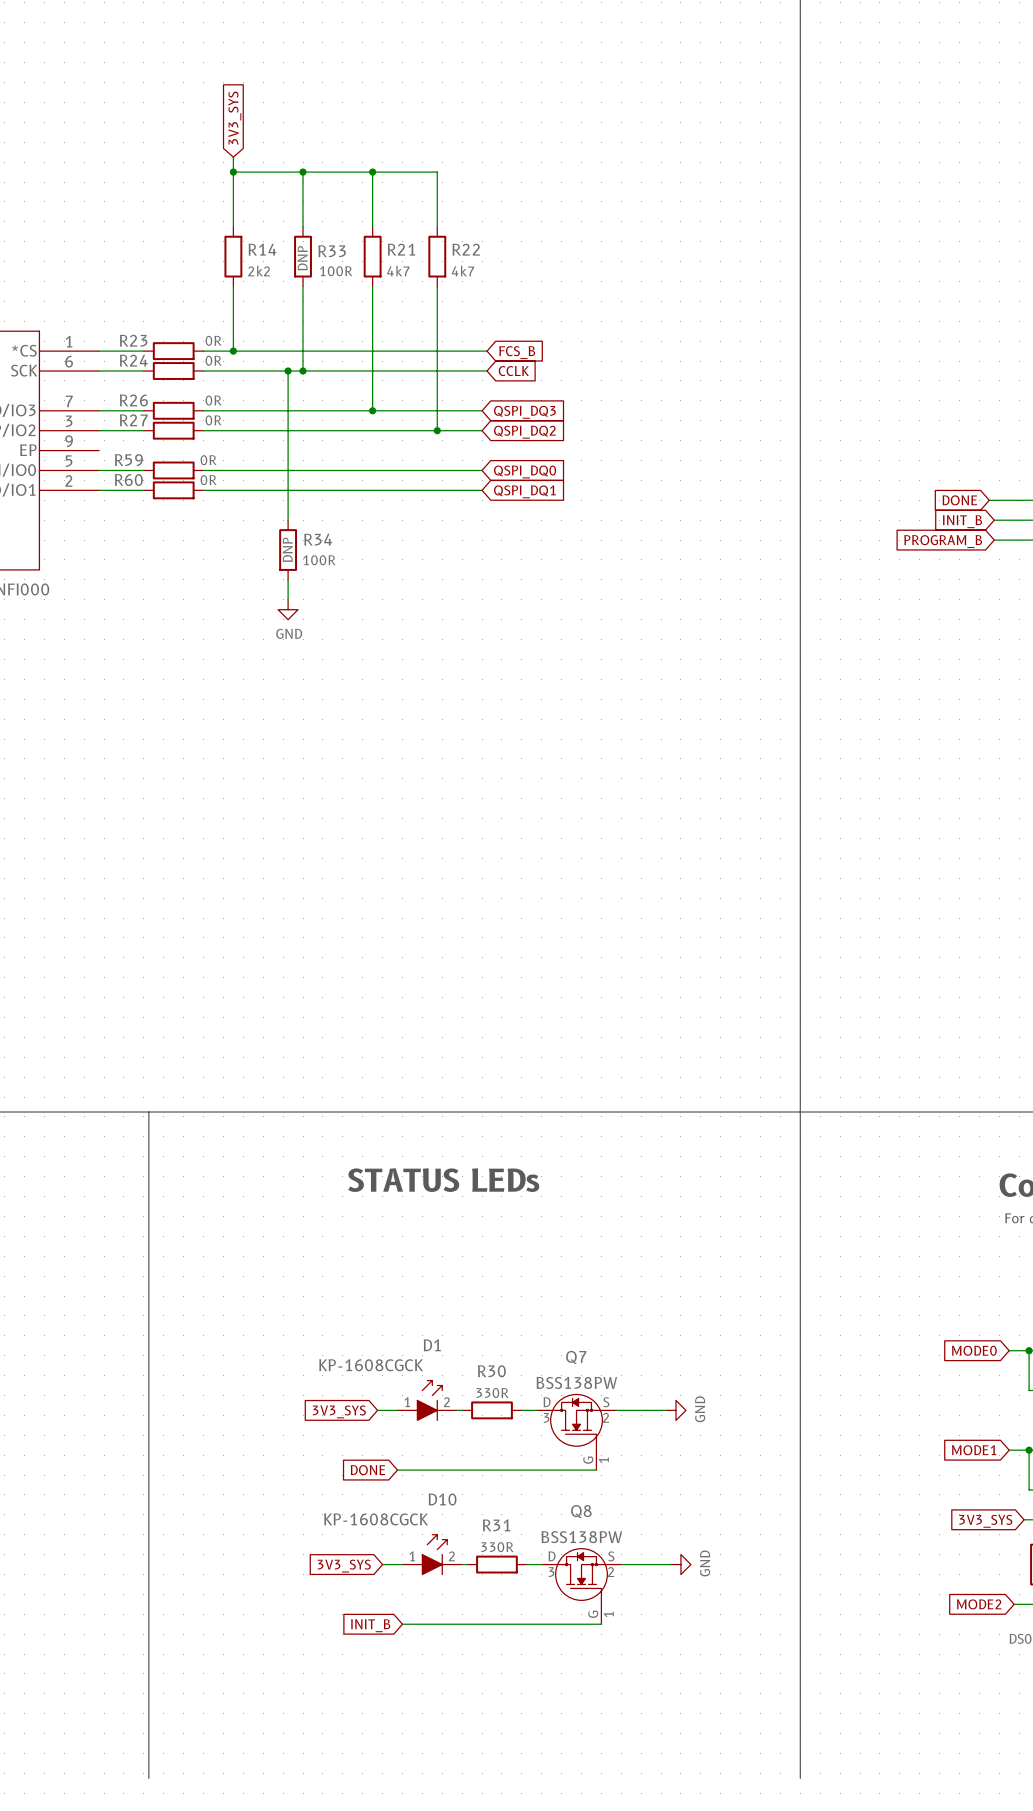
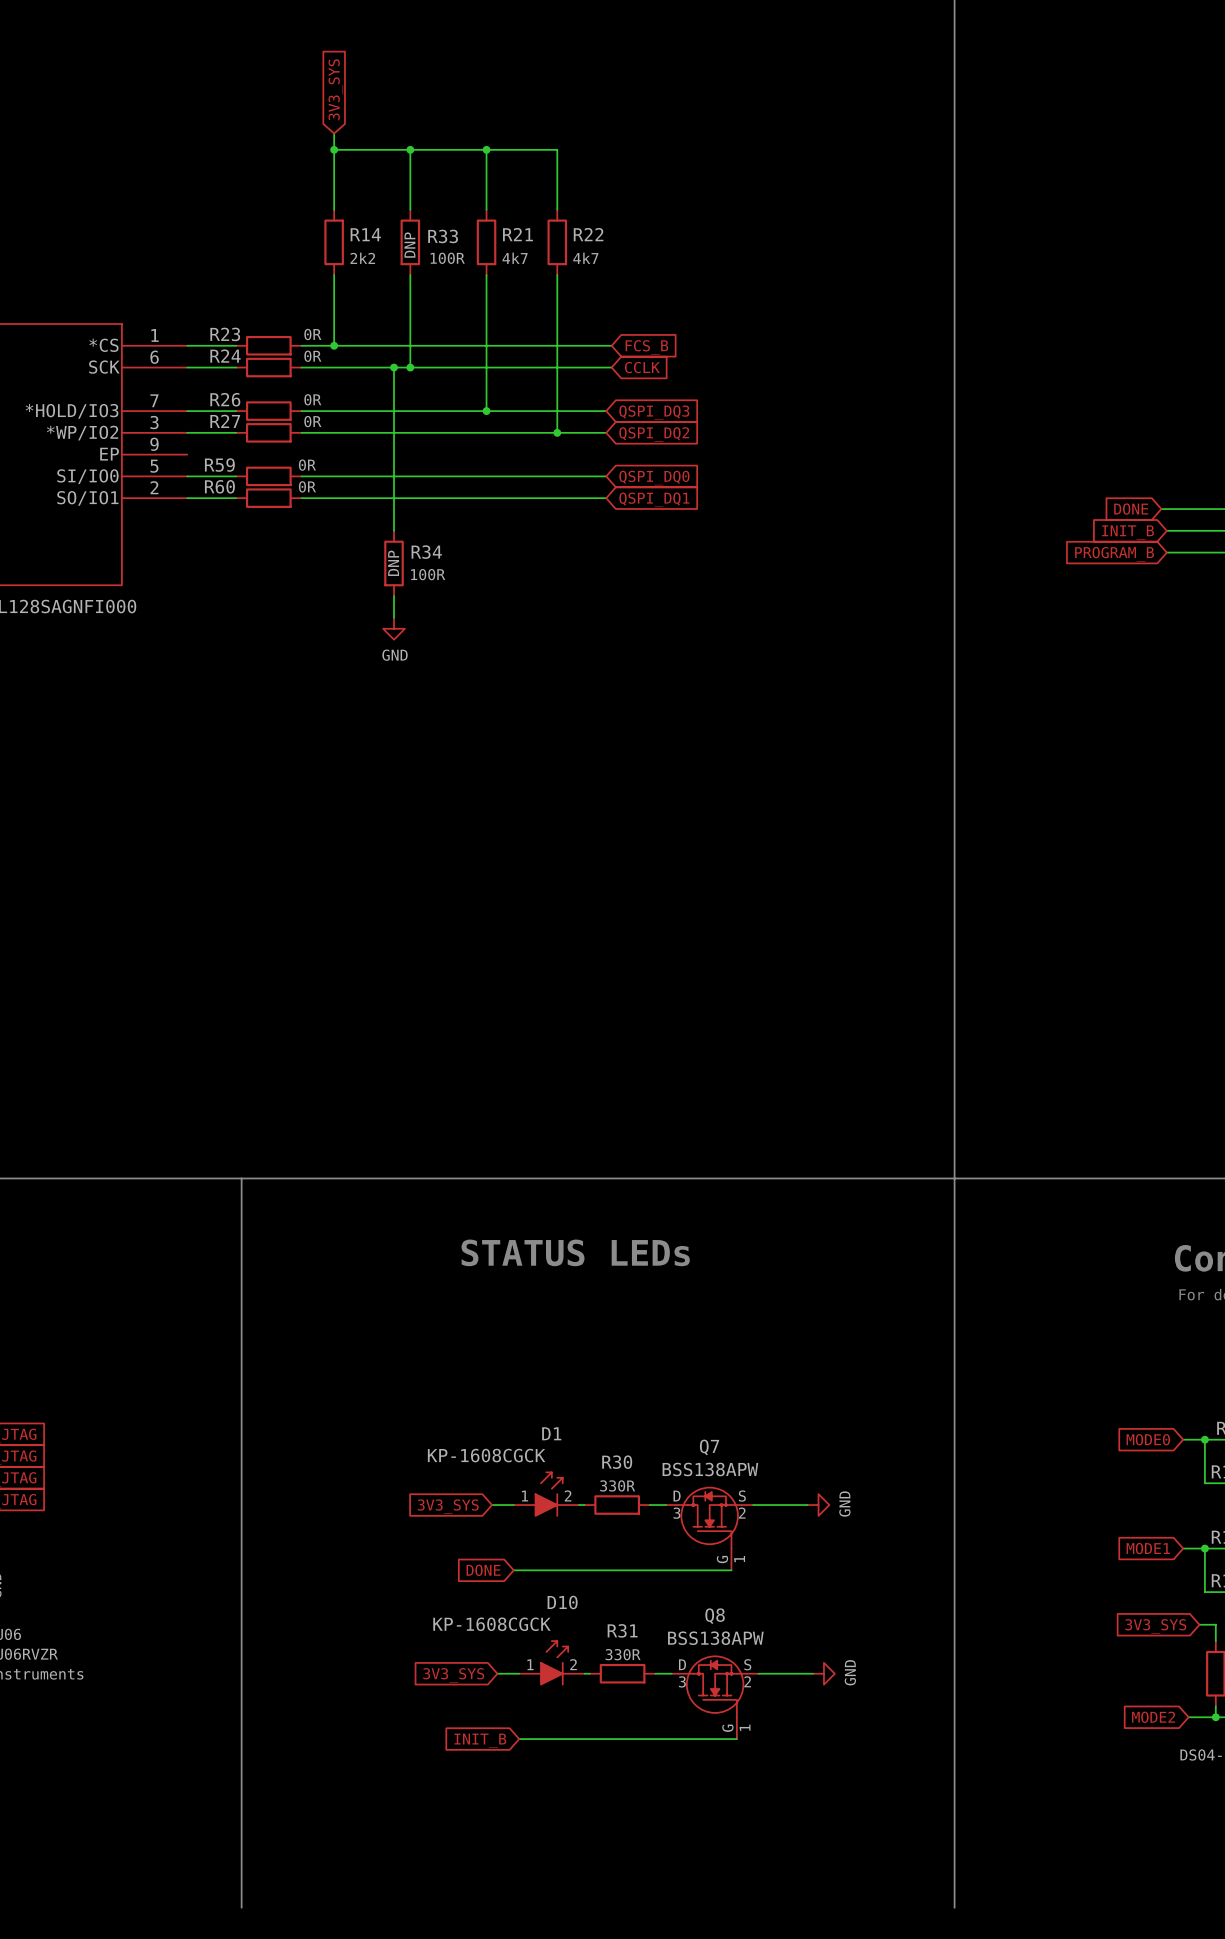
Q7 value: BSS138PW (576, 1382) -> BSS138APW (710, 1469)
Q8 value: BSS138PW (581, 1537) -> BSS138APW (715, 1638)

